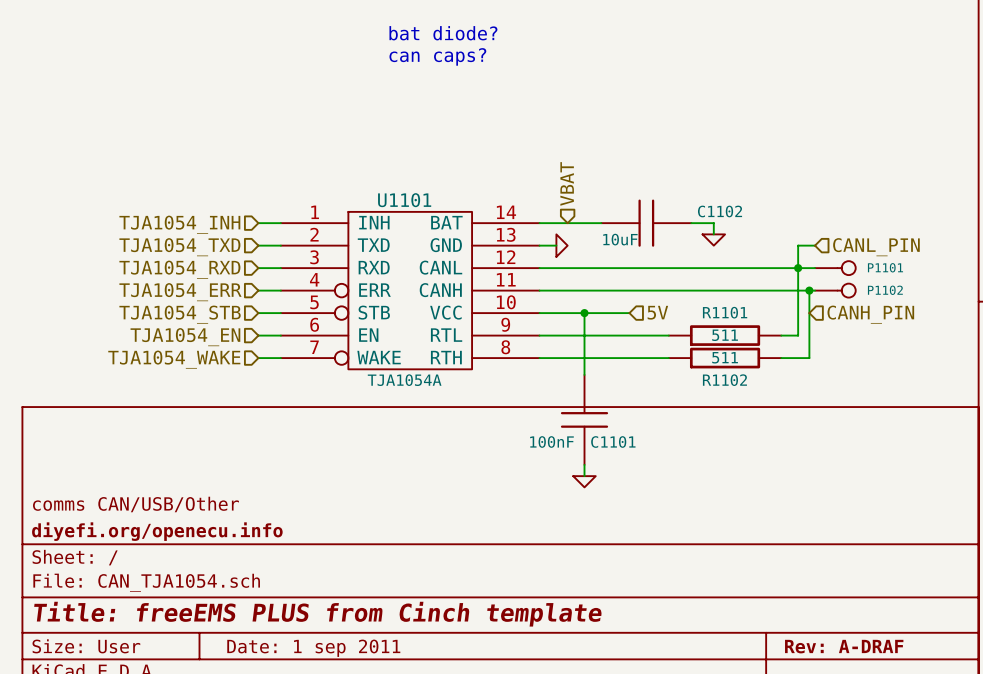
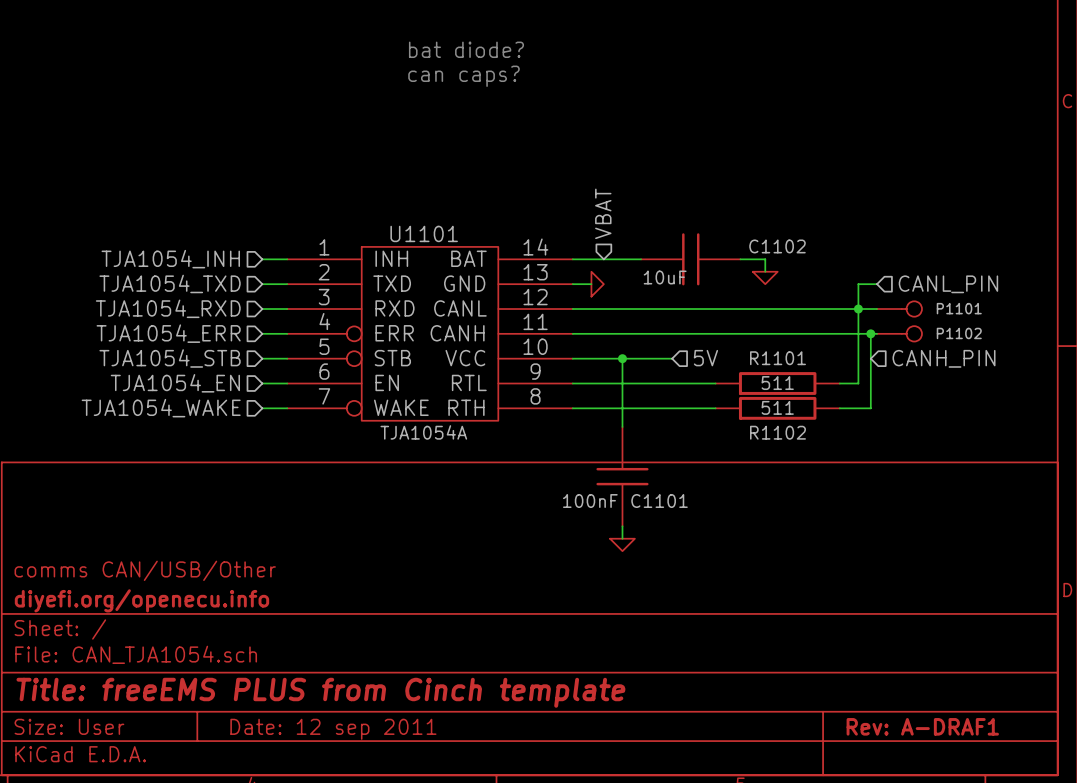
title block: Rev: A-DRAF (844, 646) -> Rev: A-DRAF1 (922, 726)
title block: Date: 1 sep 2011 (313, 648) -> Date: 12 sep 2011 (333, 729)

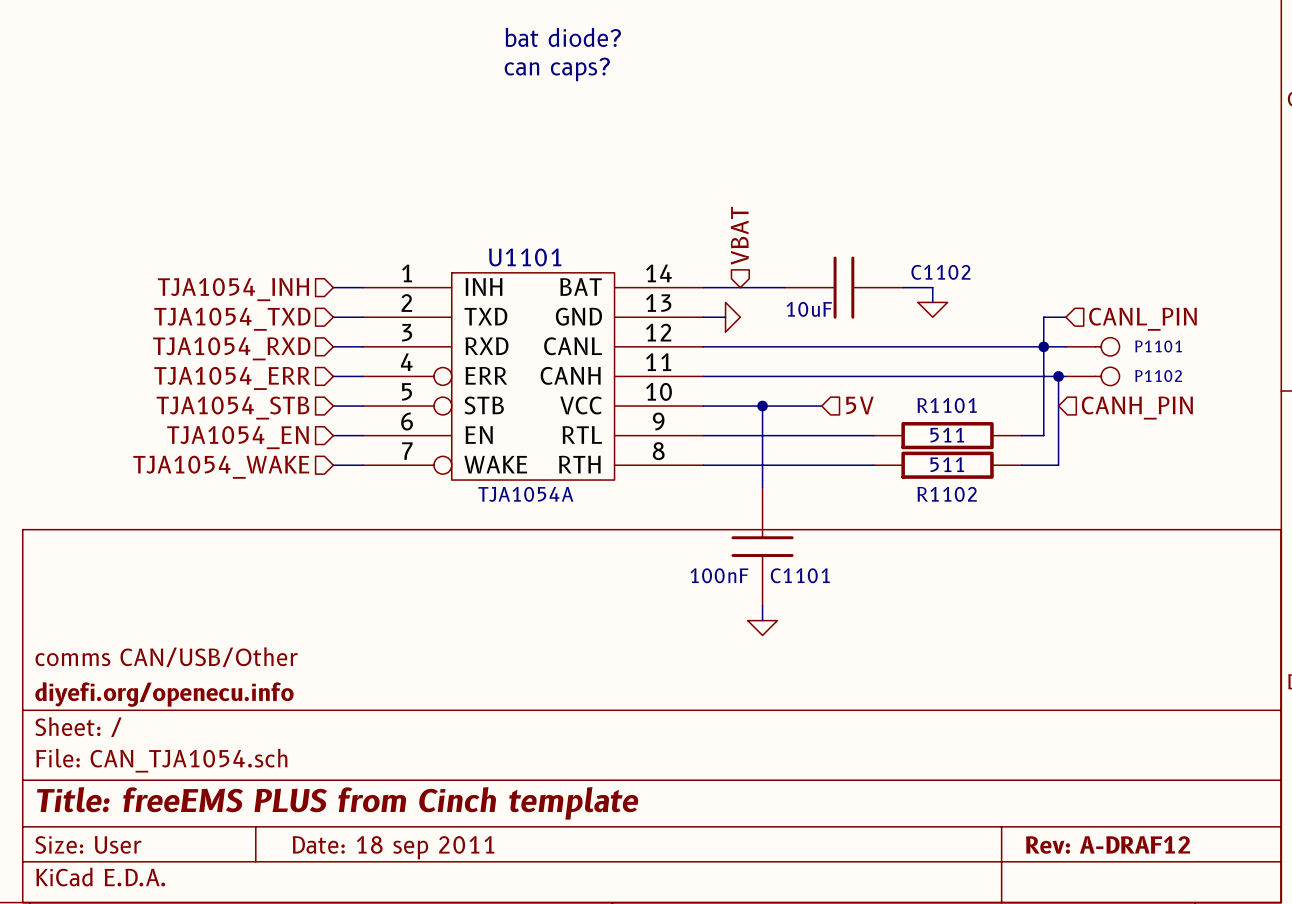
title block: Rev: A-DRAF1 (922, 726) -> Rev: A-DRAF12 (1107, 844)
title block: Date: 12 sep 2011 (333, 729) -> Date: 18 sep 2011 (393, 847)

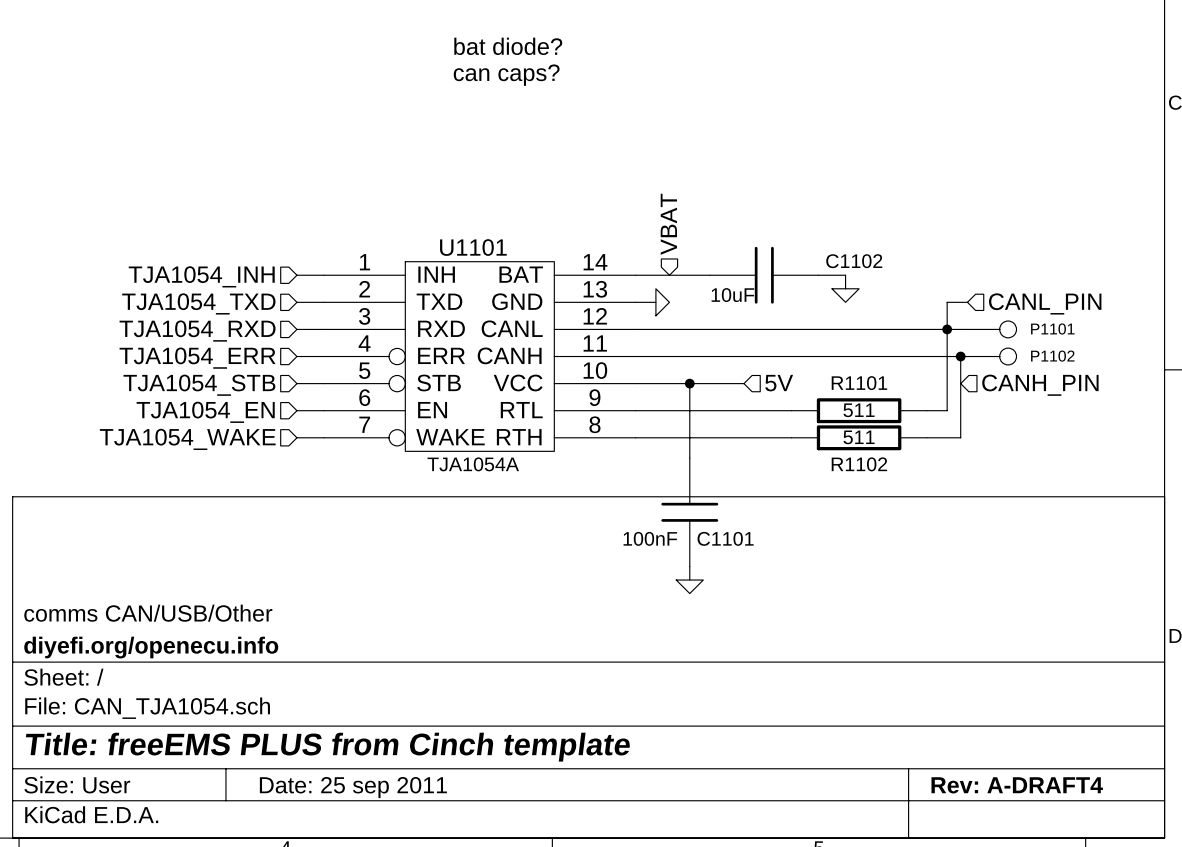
title block: Rev: A-DRAF12 (1107, 844) -> Rev: A-DRAFT4 (1017, 785)
title block: Date: 18 sep 2011 (393, 847) -> Date: 25 sep 2011 (353, 787)

